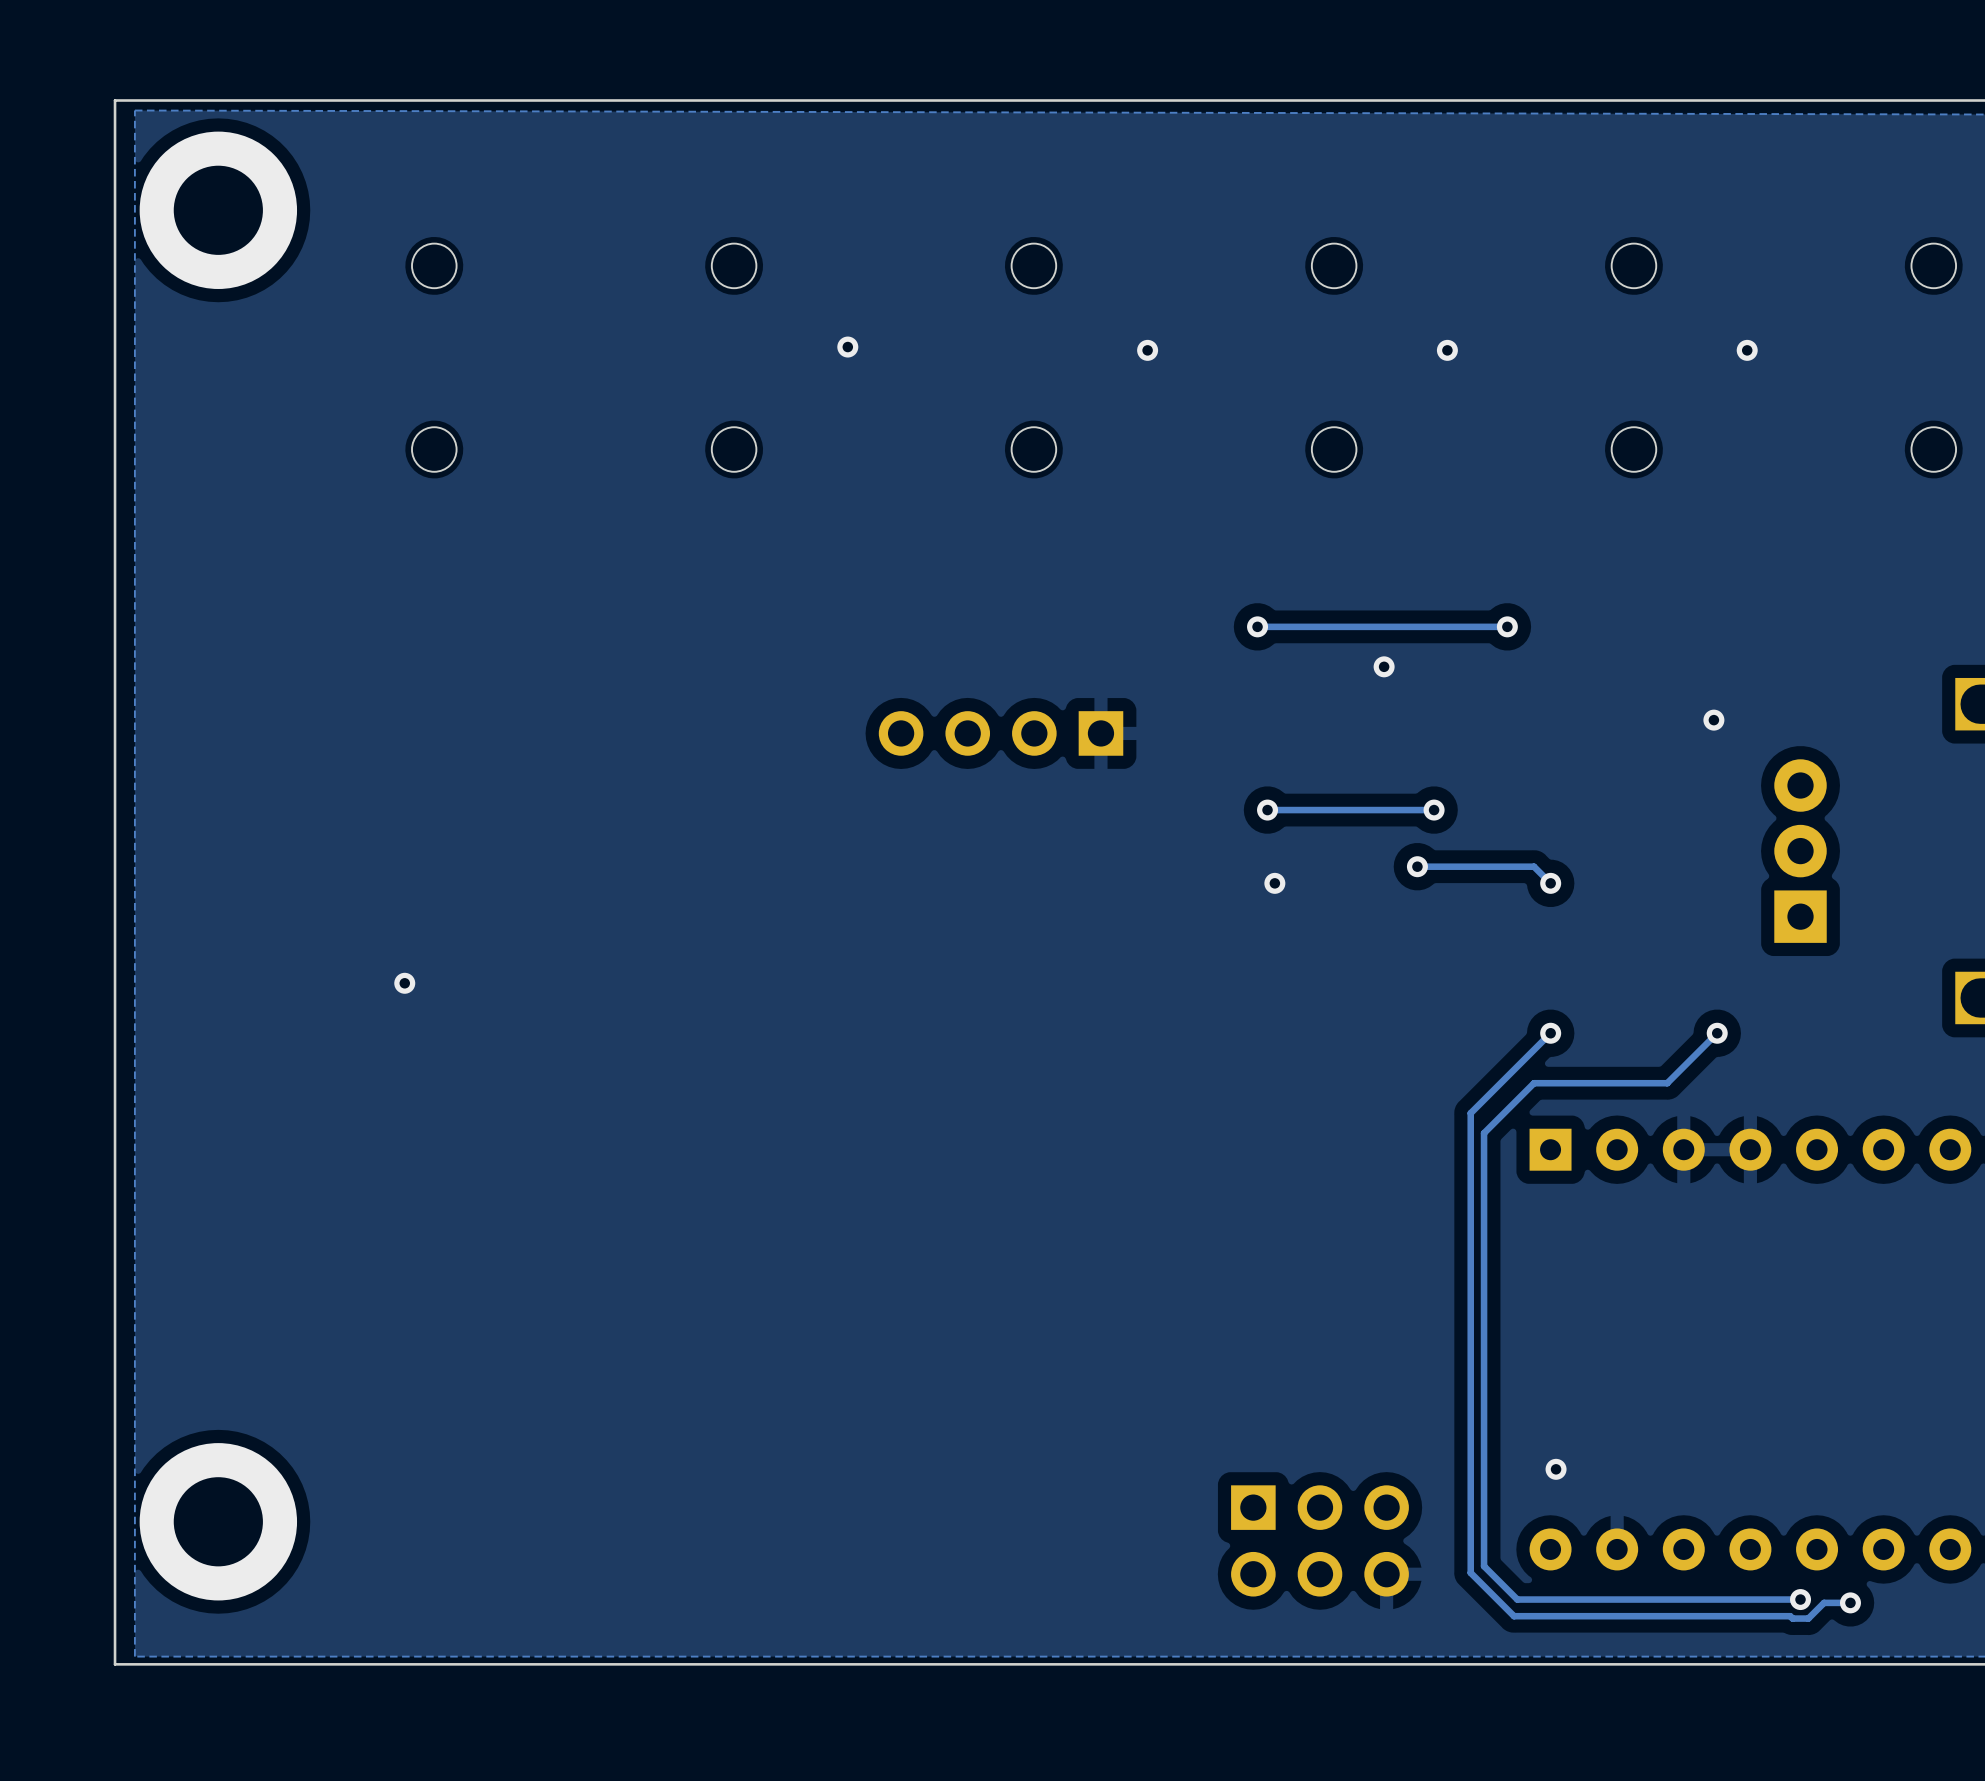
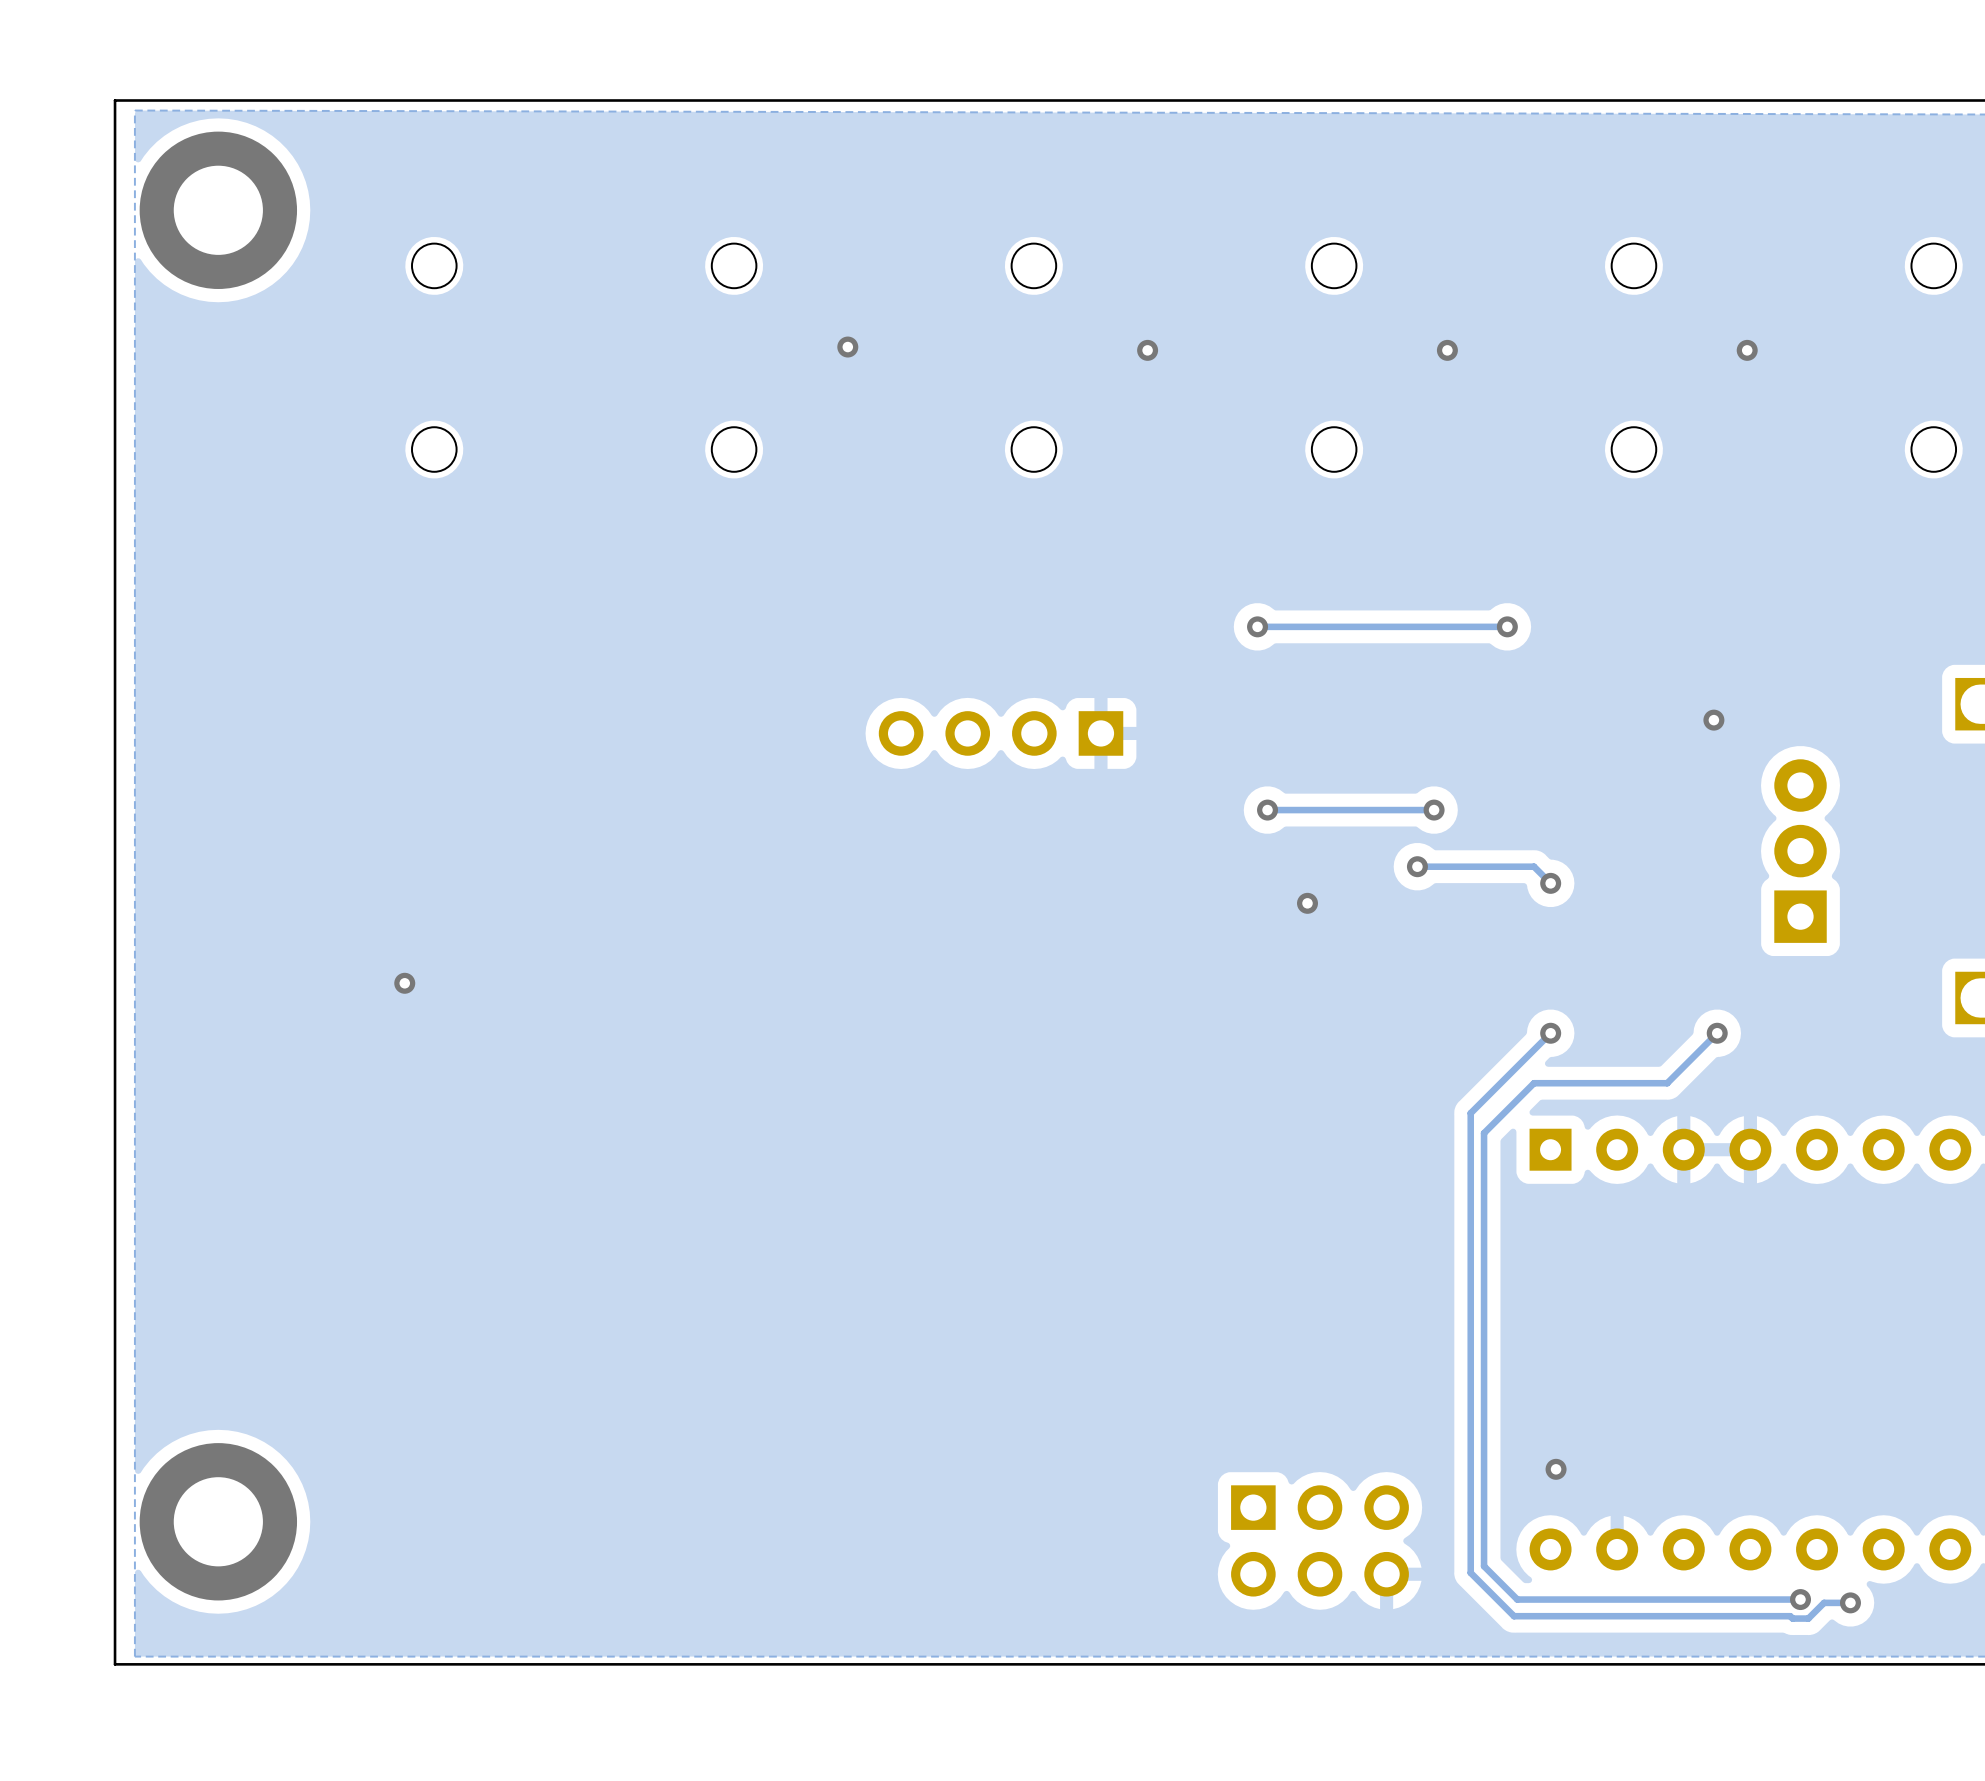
via: (1384, 666) -> none
via position: (1274, 883) -> (1307, 903)

